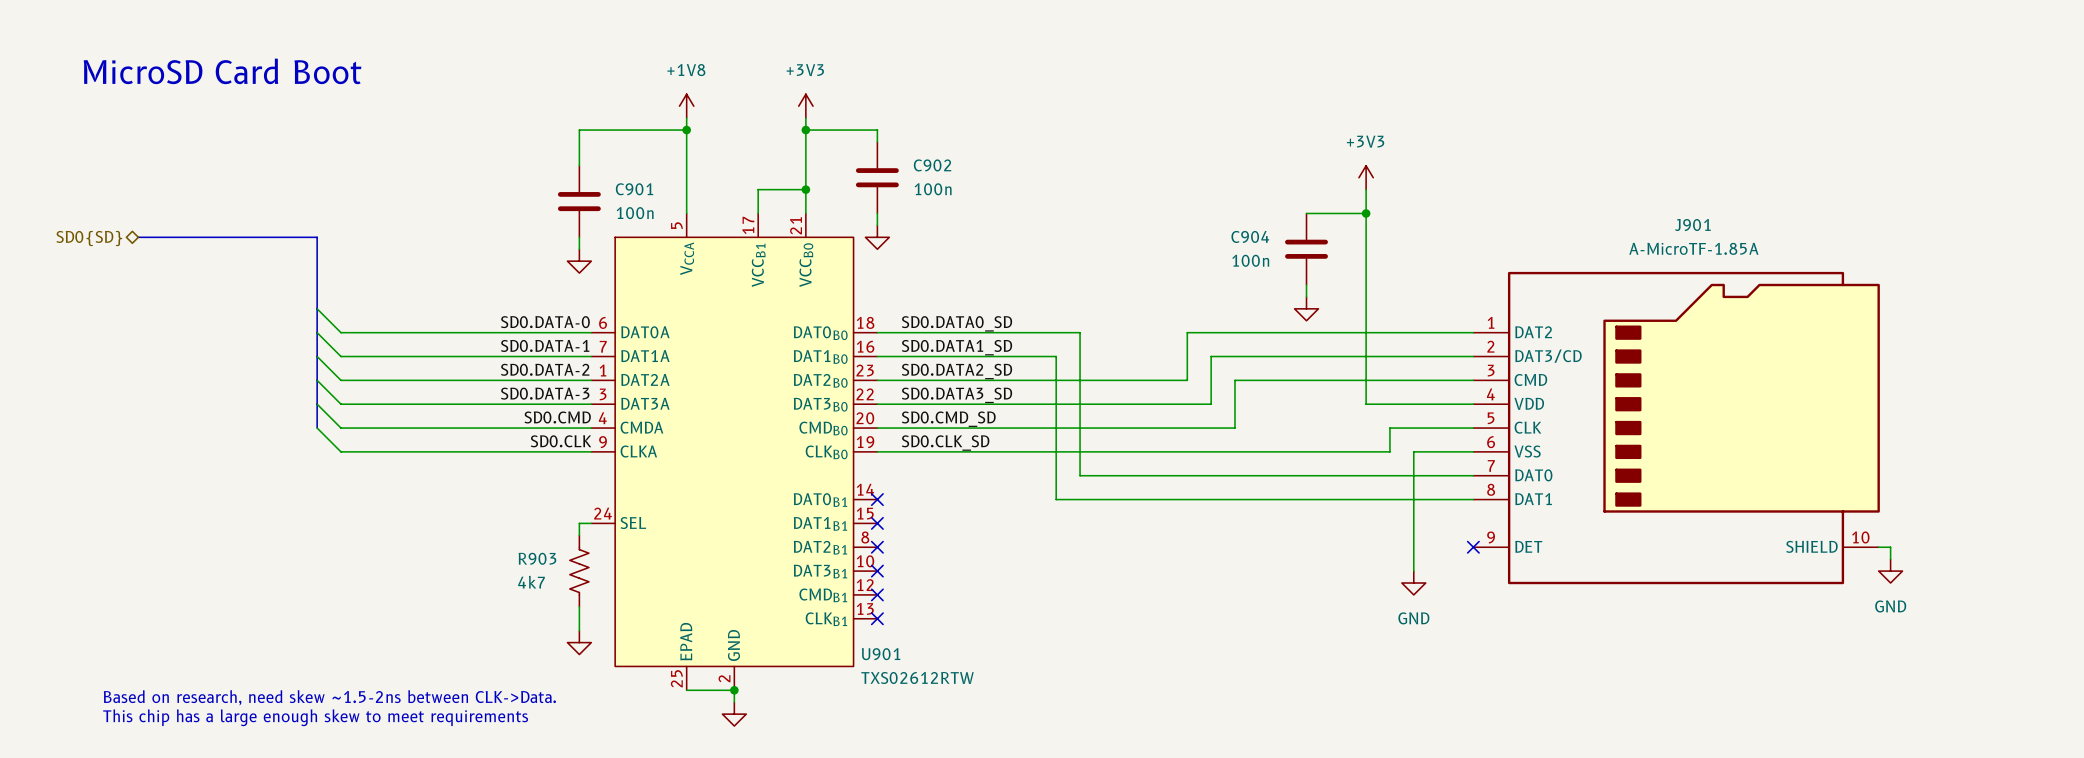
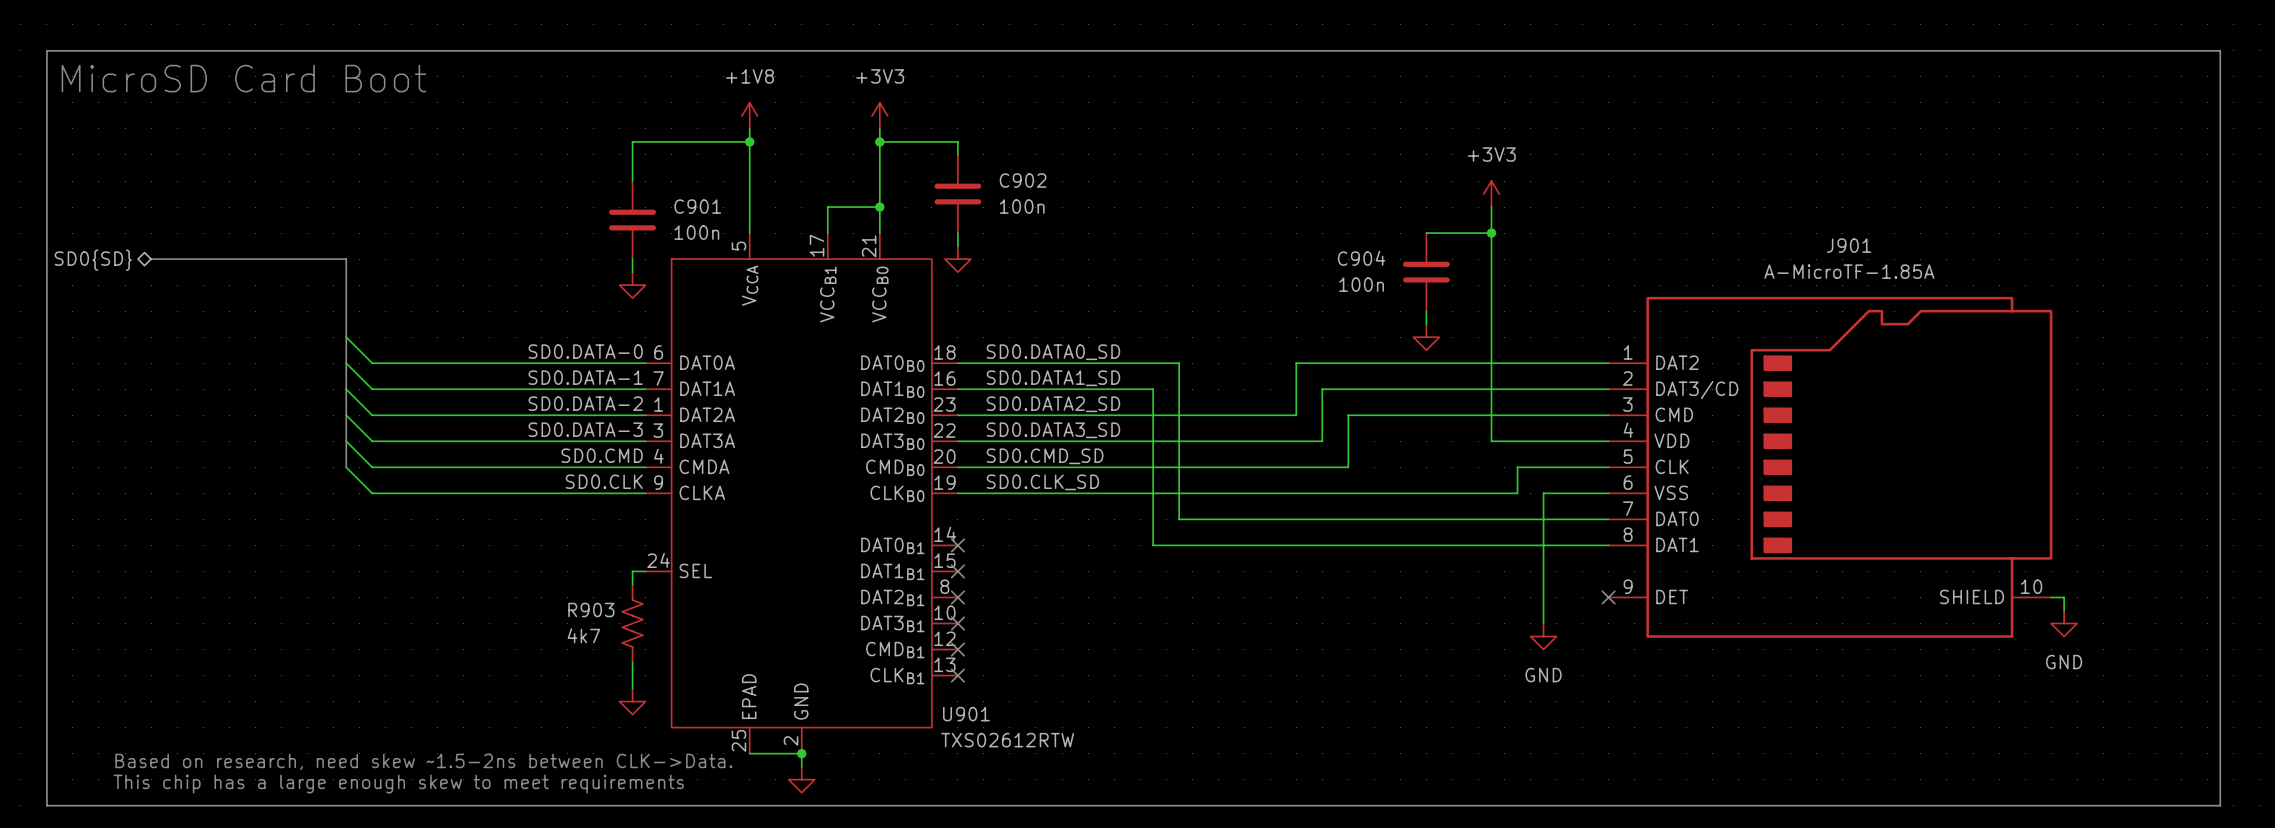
line: none -> (46, 50) (2220, 50) (2220, 805) (46, 805) (46, 50)

